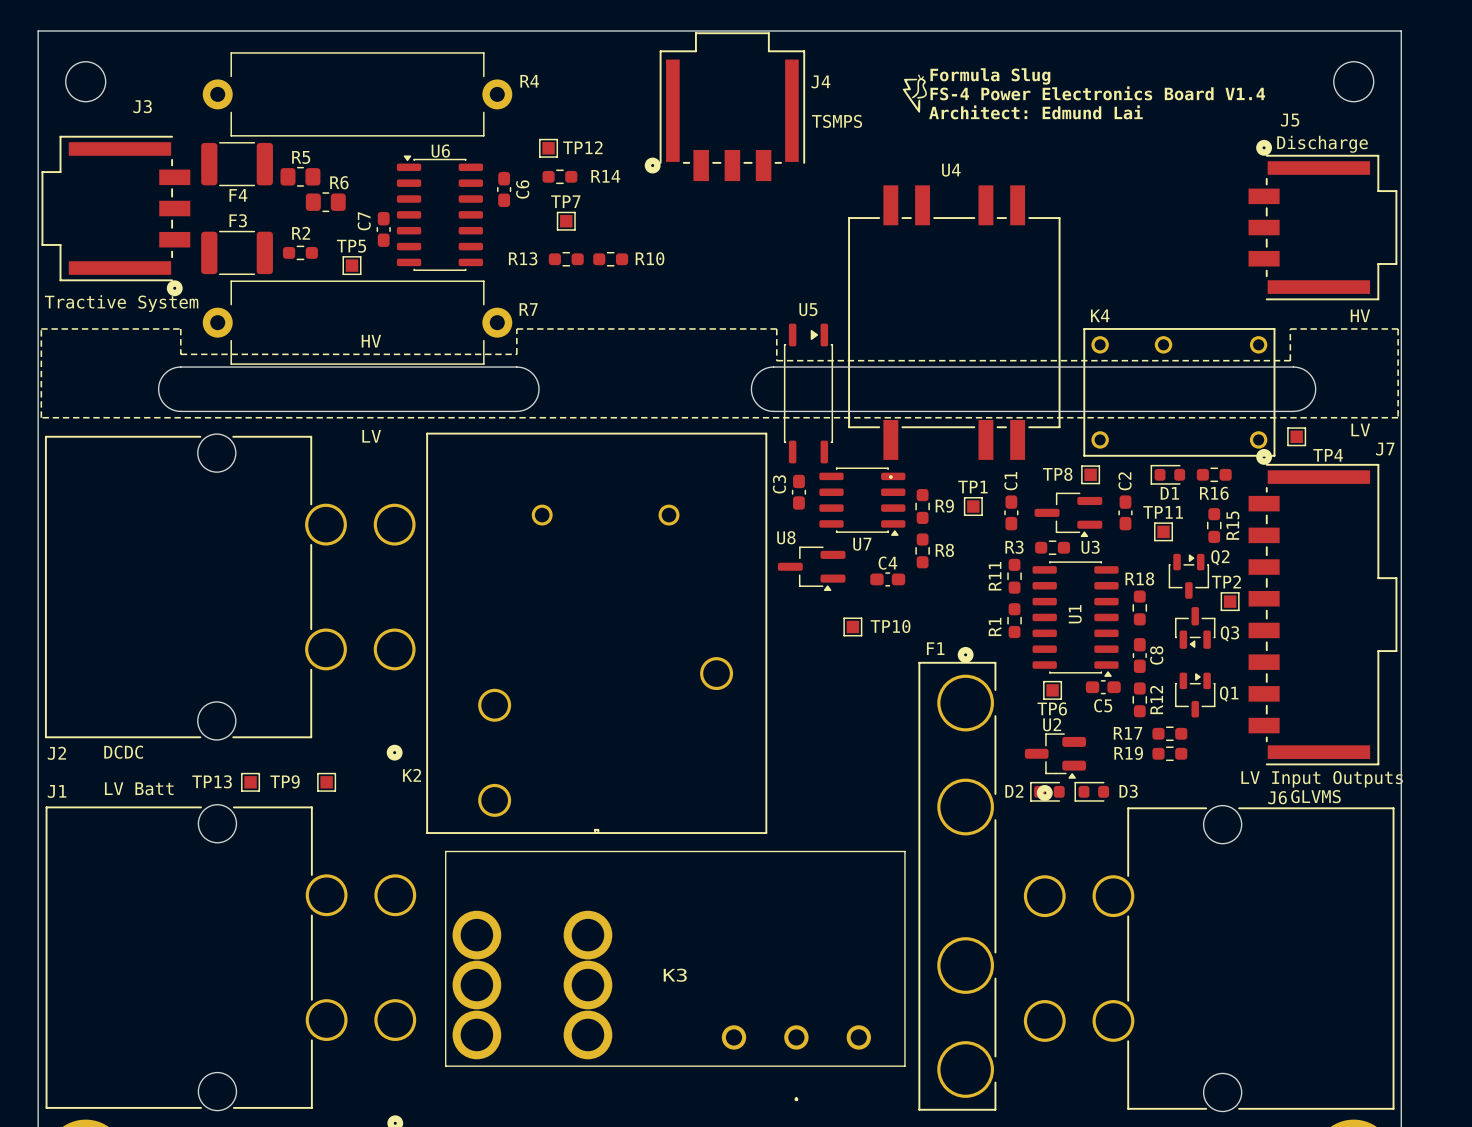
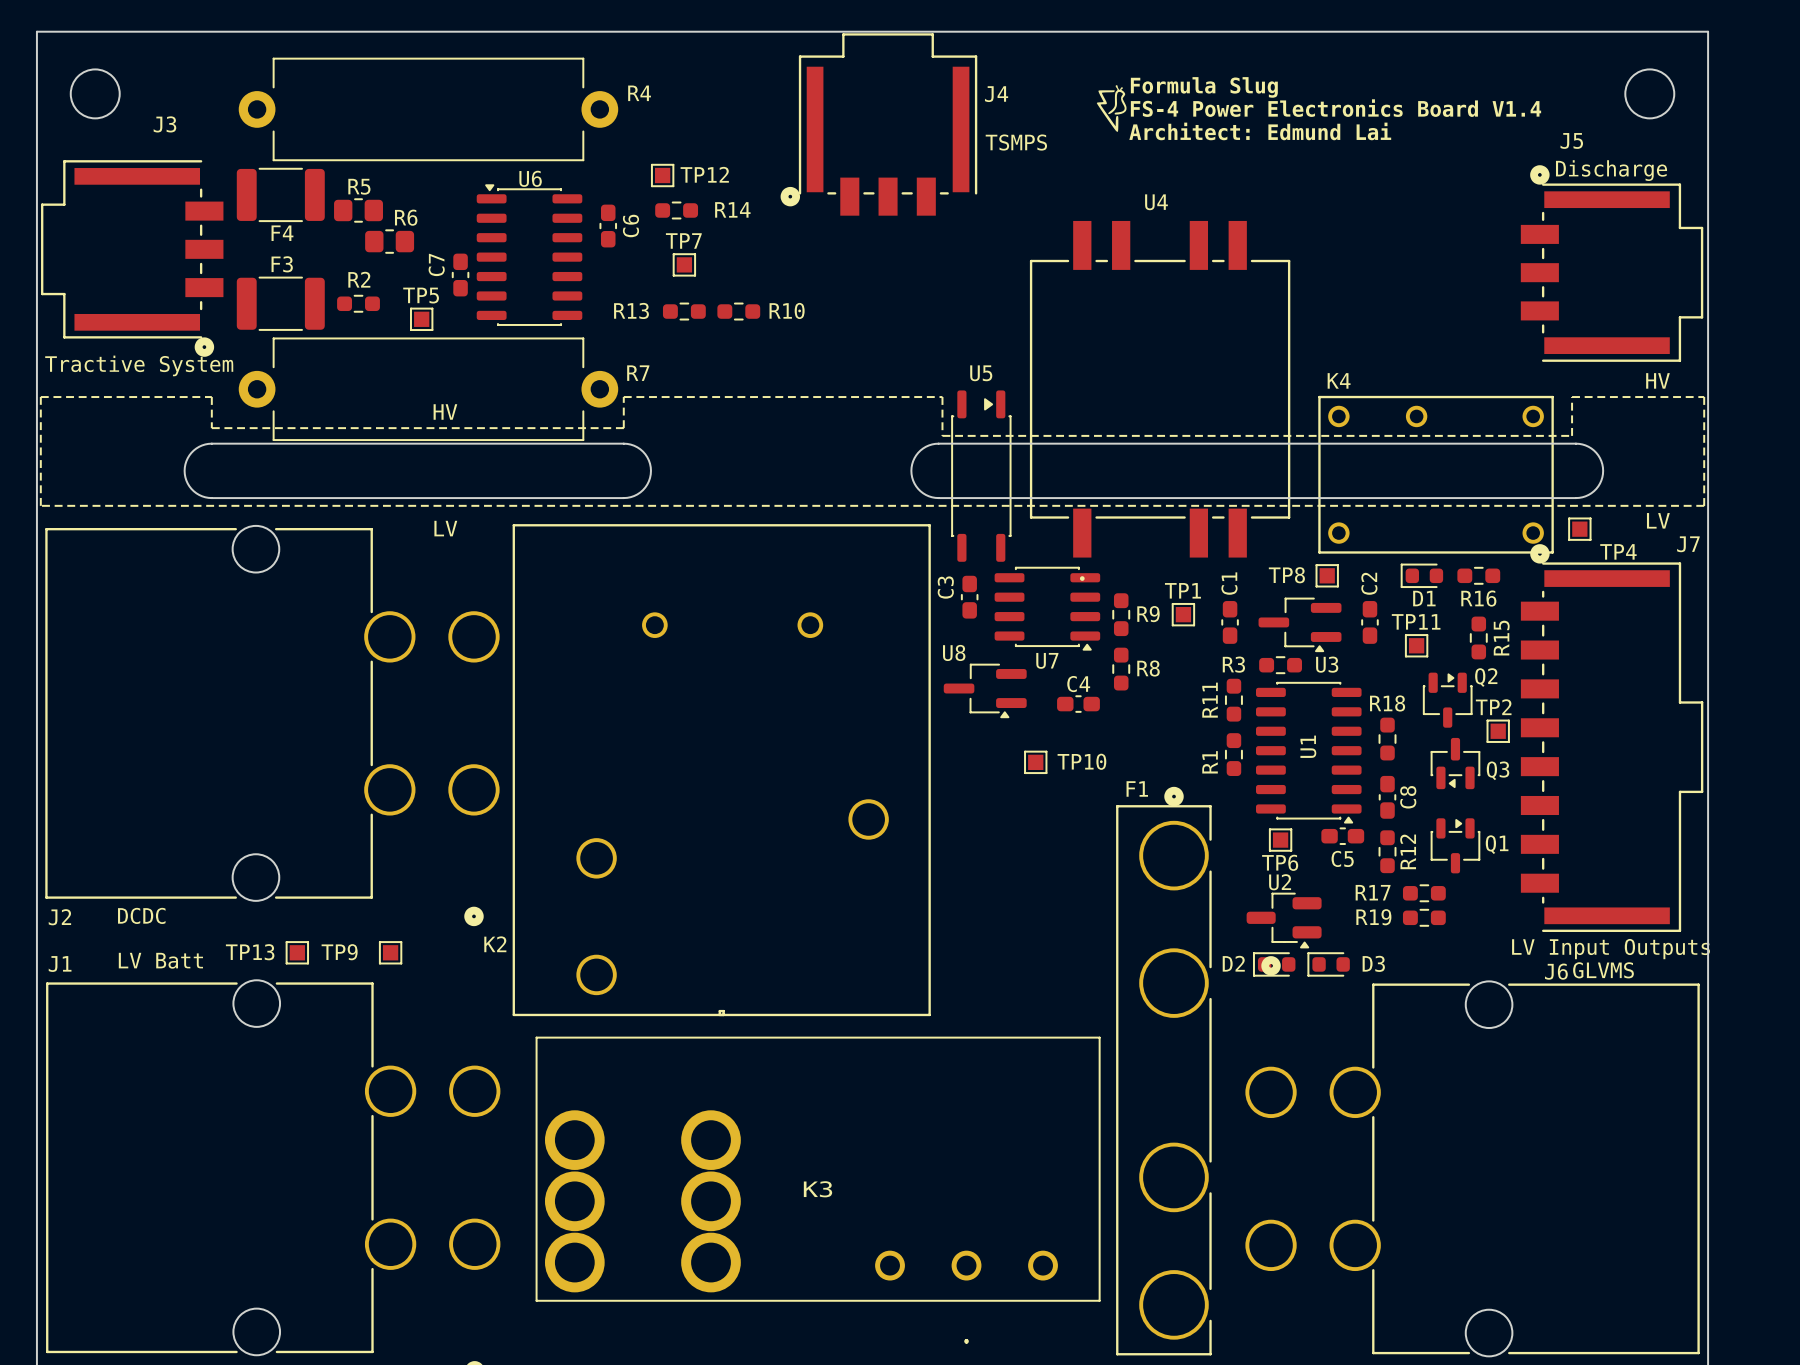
drawing shape: [902, 68, 1266, 120] -> [1096, 77, 1542, 141]

